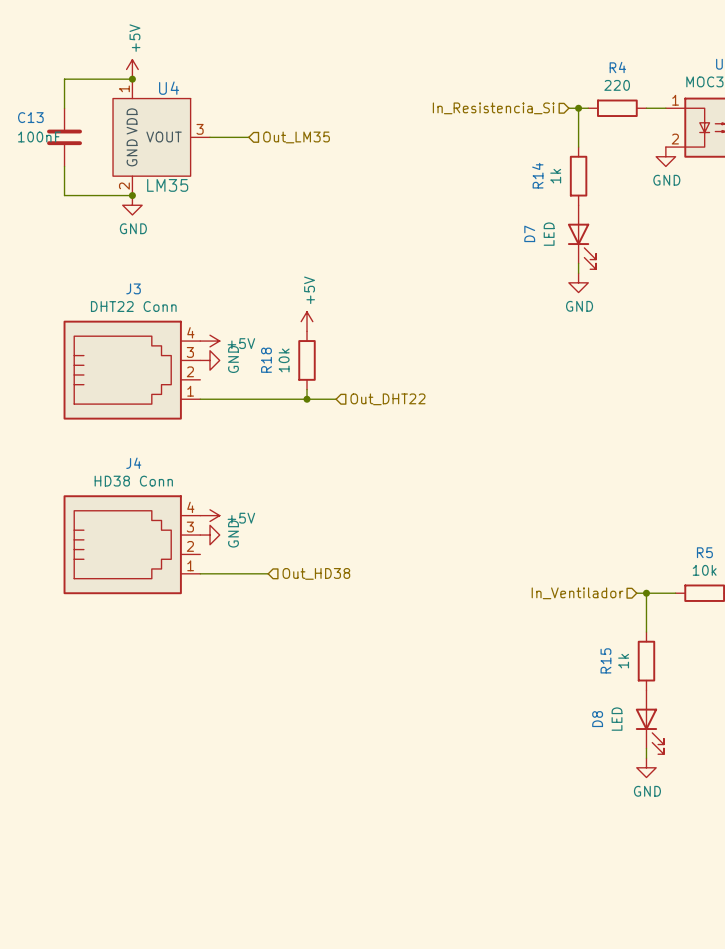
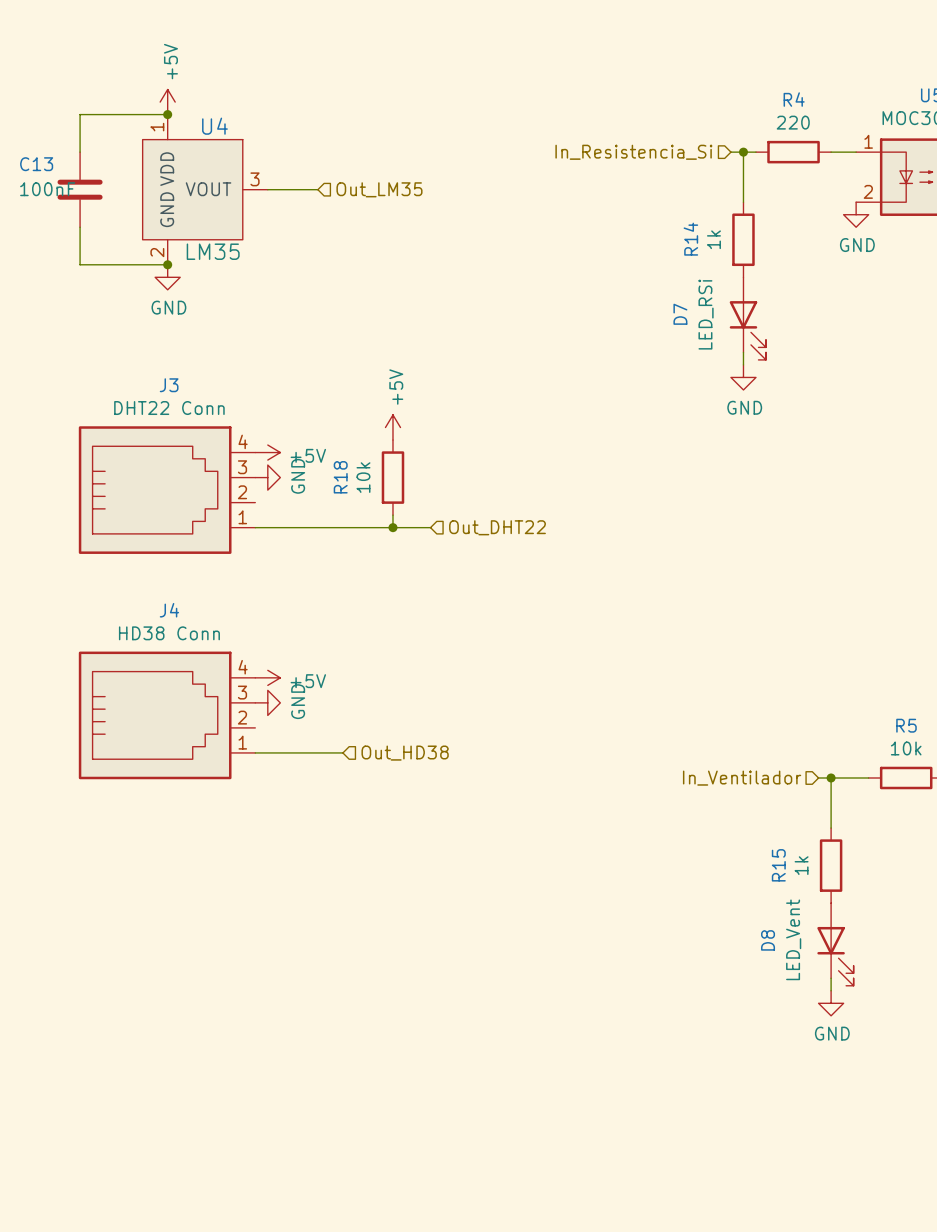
D7 value: LED (549, 234) -> LED_RSi (706, 314)
D8 value: LED (617, 719) -> LED_Vent (793, 939)

